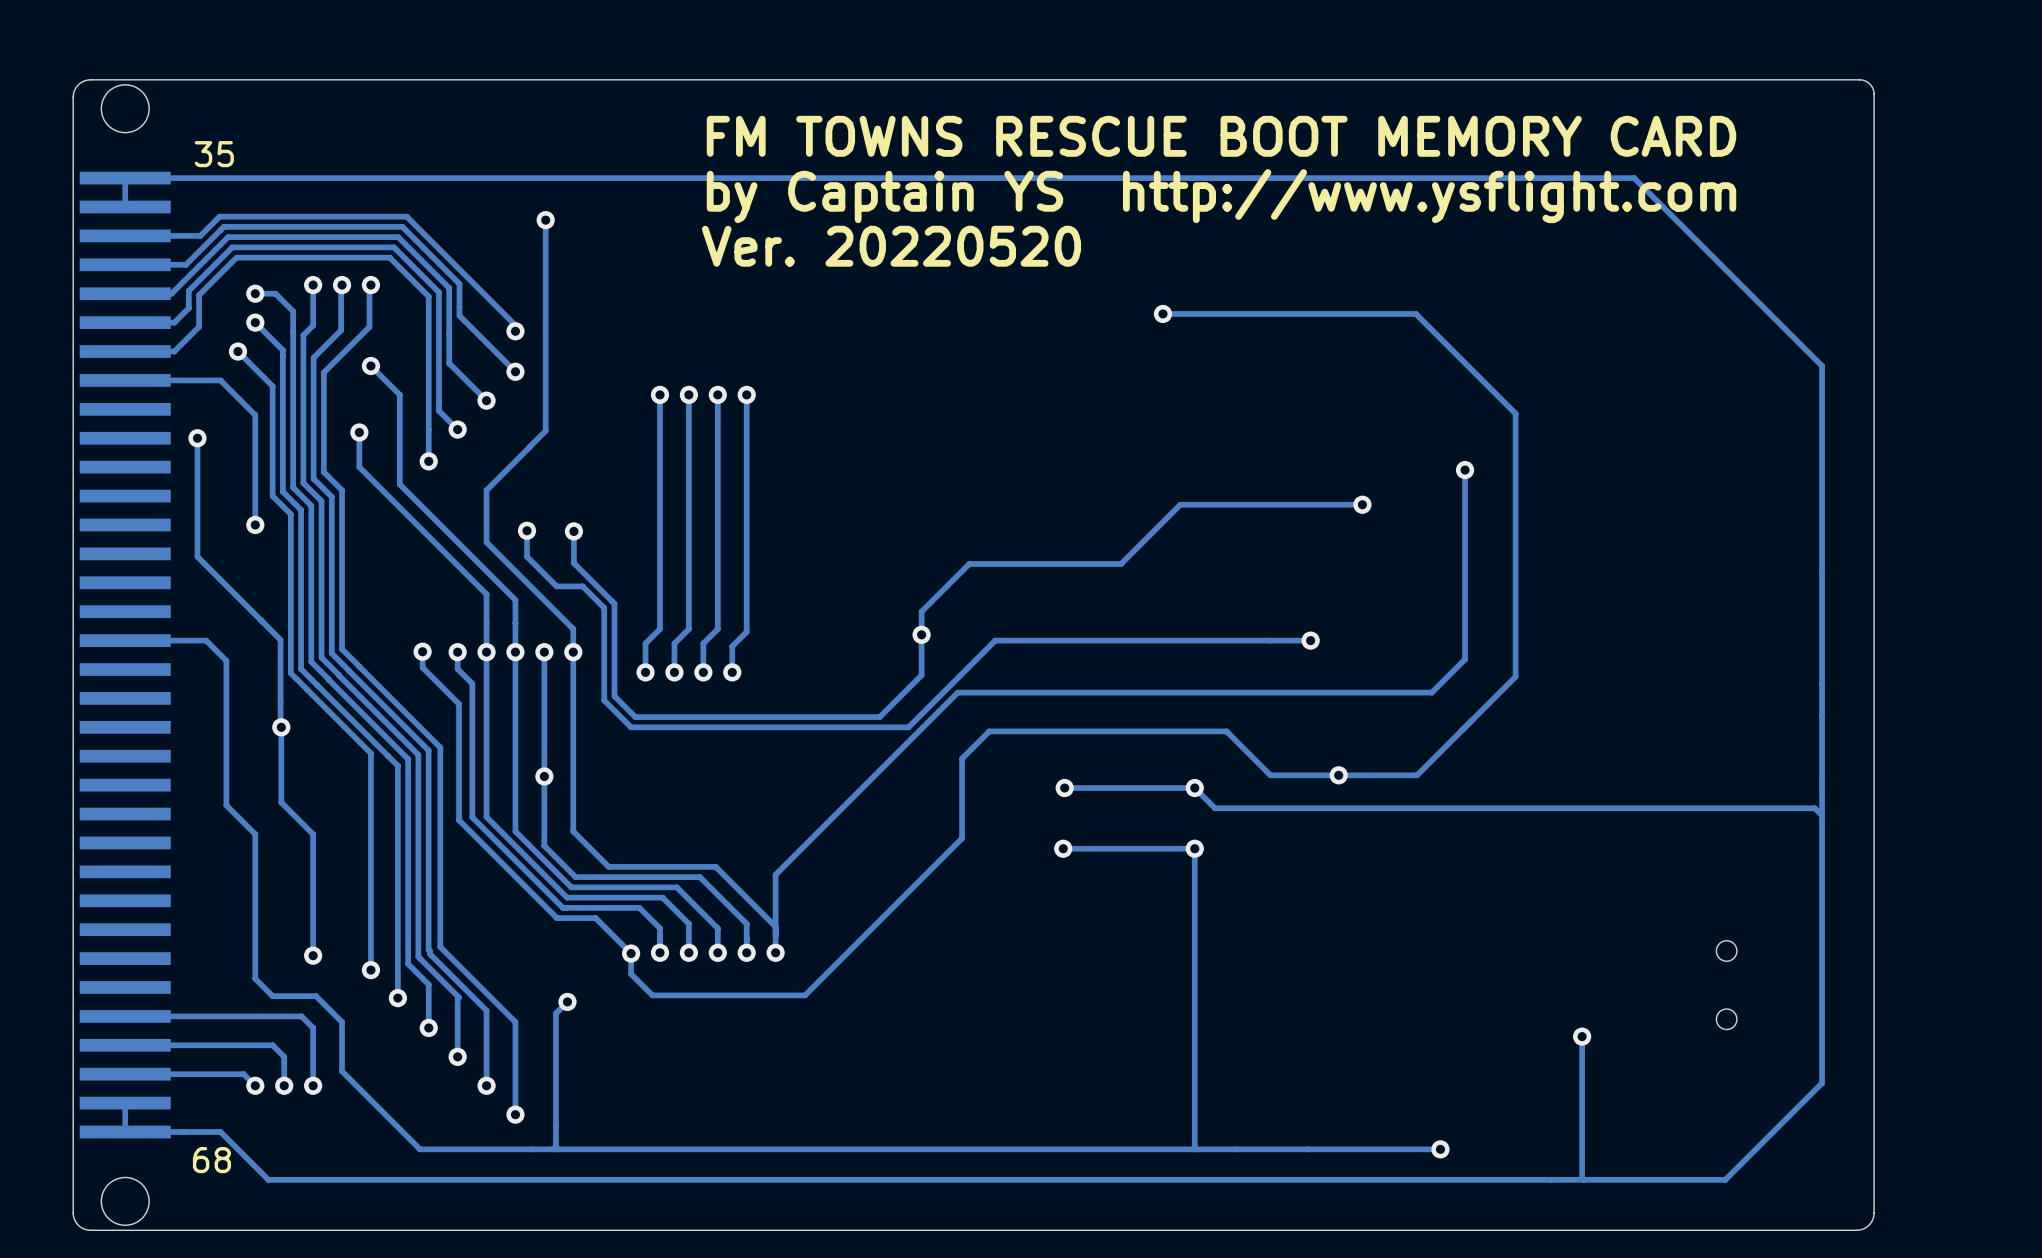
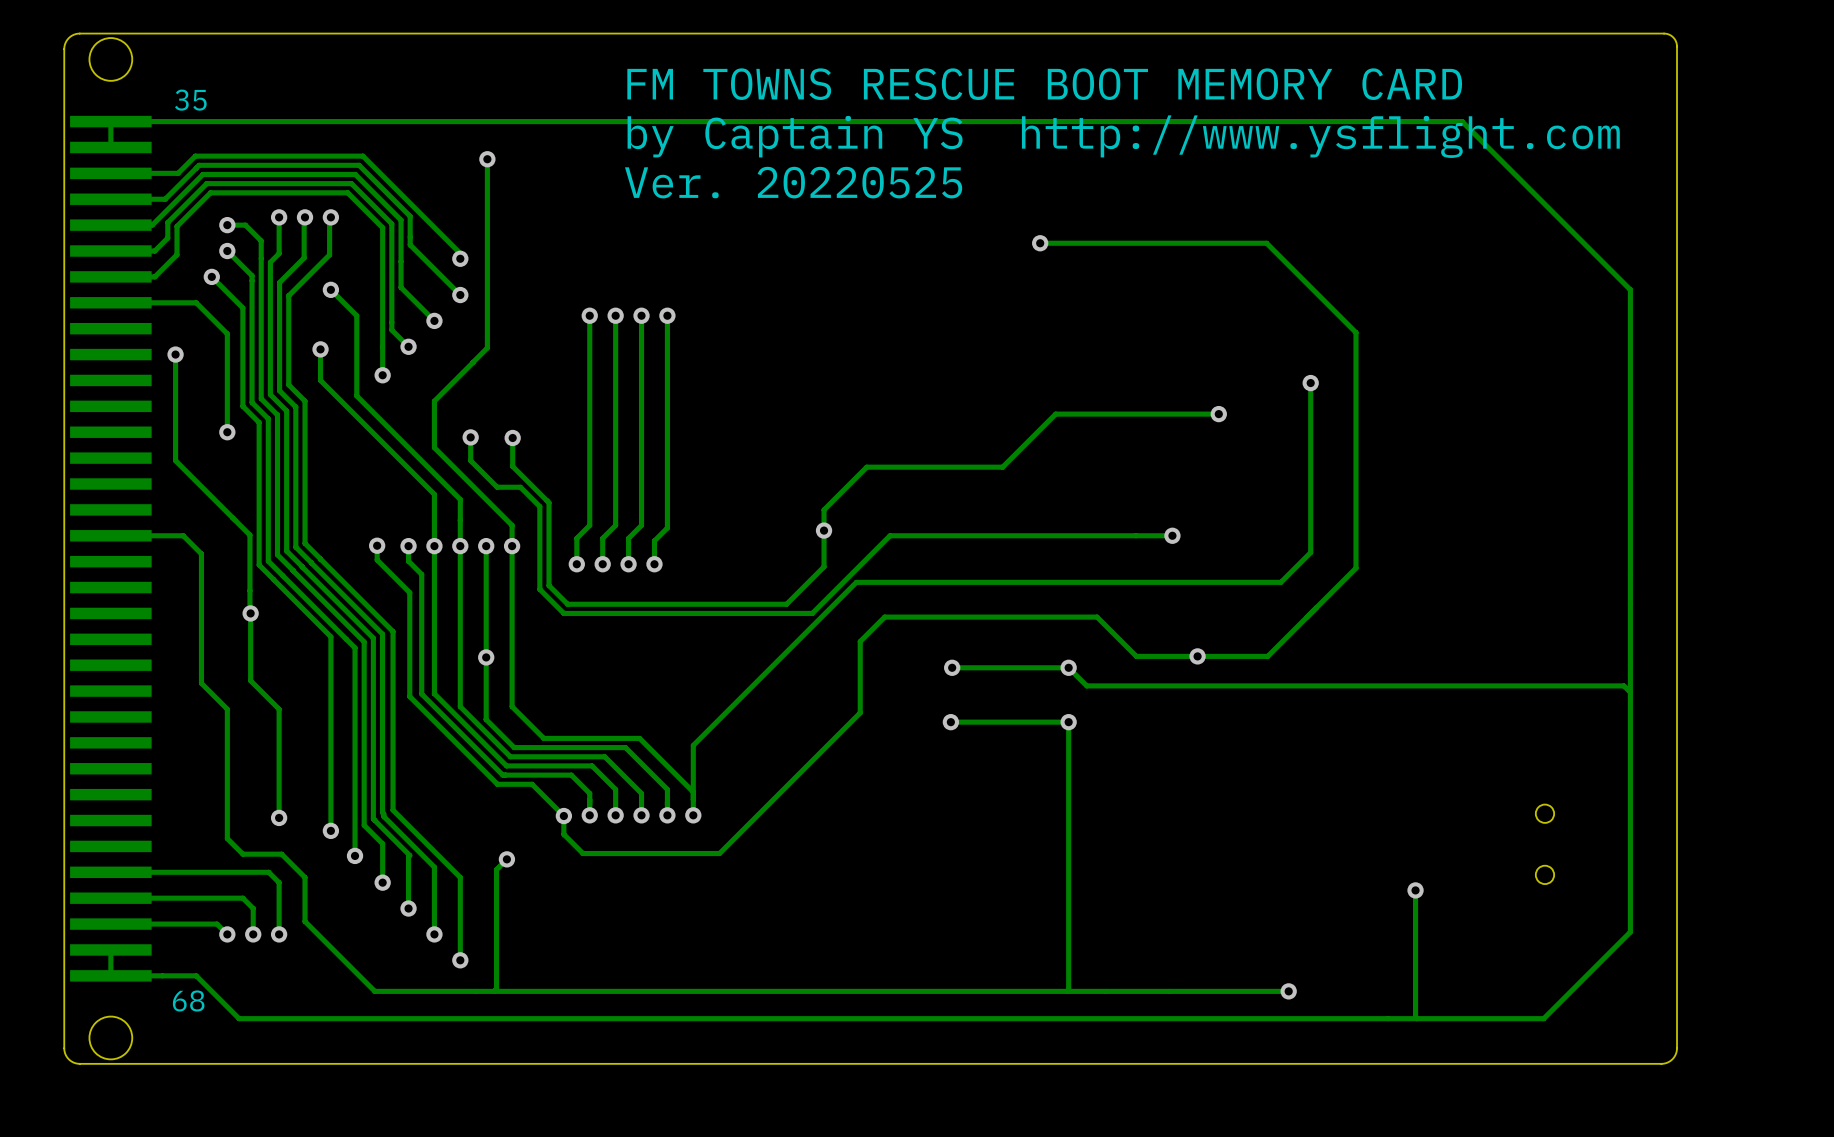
text: Ver. 20220520 (891, 246) -> Ver. 20220525 (793, 182)

